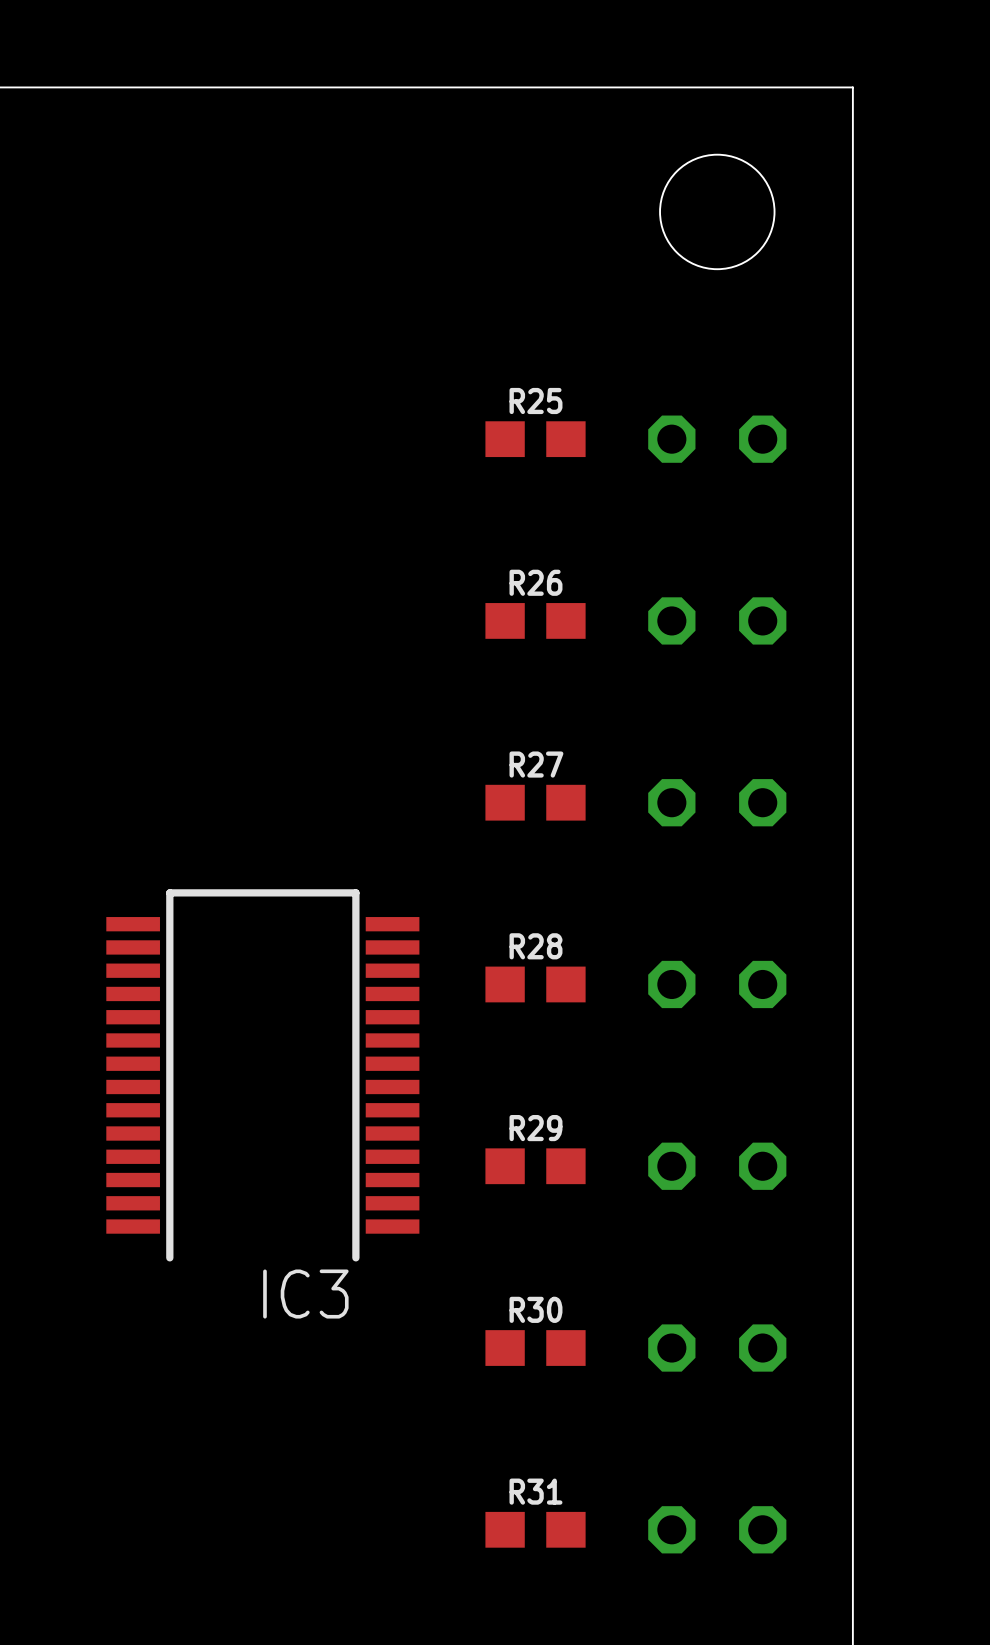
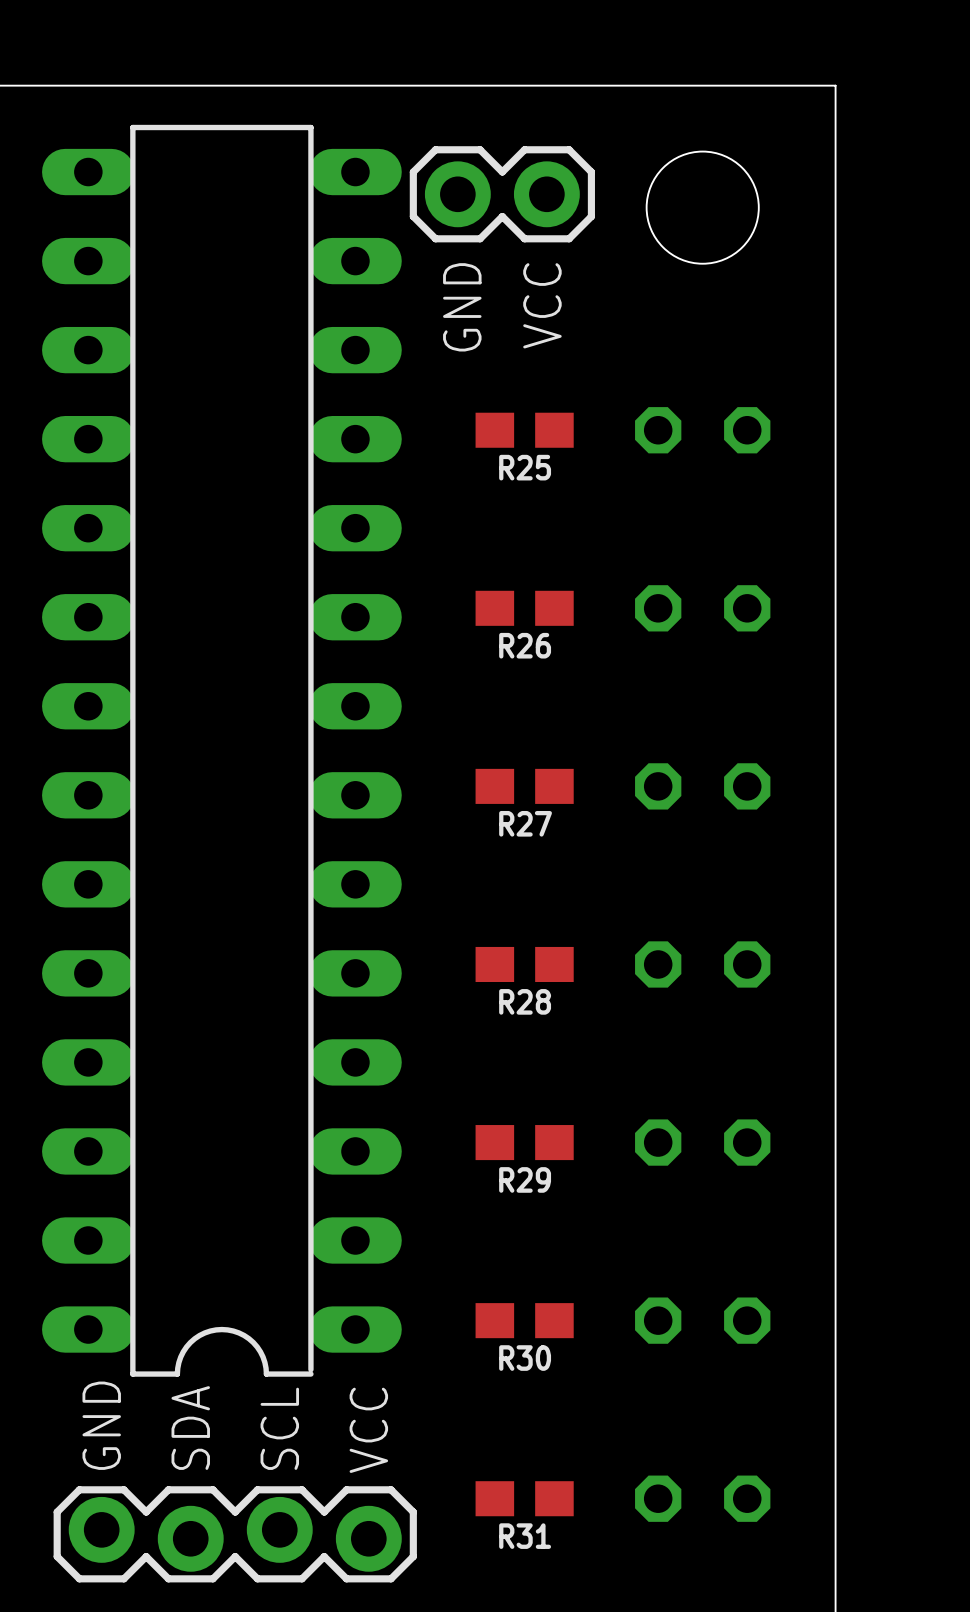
part: none -> (502, 194)
text: none -> VCC (542, 305)
text: none -> GND (462, 307)
R25 name position: R25 (535, 400) -> R25 (525, 467)
R26 name position: R26 (535, 582) -> R26 (525, 645)
R27 name position: R27 (536, 764) -> R27 (525, 823)
part: none -> (221, 750)
R28 name position: R28 (535, 946) -> R28 (525, 1001)
IC3: (262, 1075) -> none
R29 name position: R29 (535, 1128) -> R29 (525, 1179)
R30 name position: R30 (535, 1309) -> R30 (525, 1358)
text: none -> GND (101, 1425)
text: none -> SDA (190, 1428)
text: none -> SCL (279, 1428)
text: none -> VCC (368, 1430)
R31 name position: R31 (535, 1491) -> R31 (525, 1536)
part: none -> (235, 1534)

